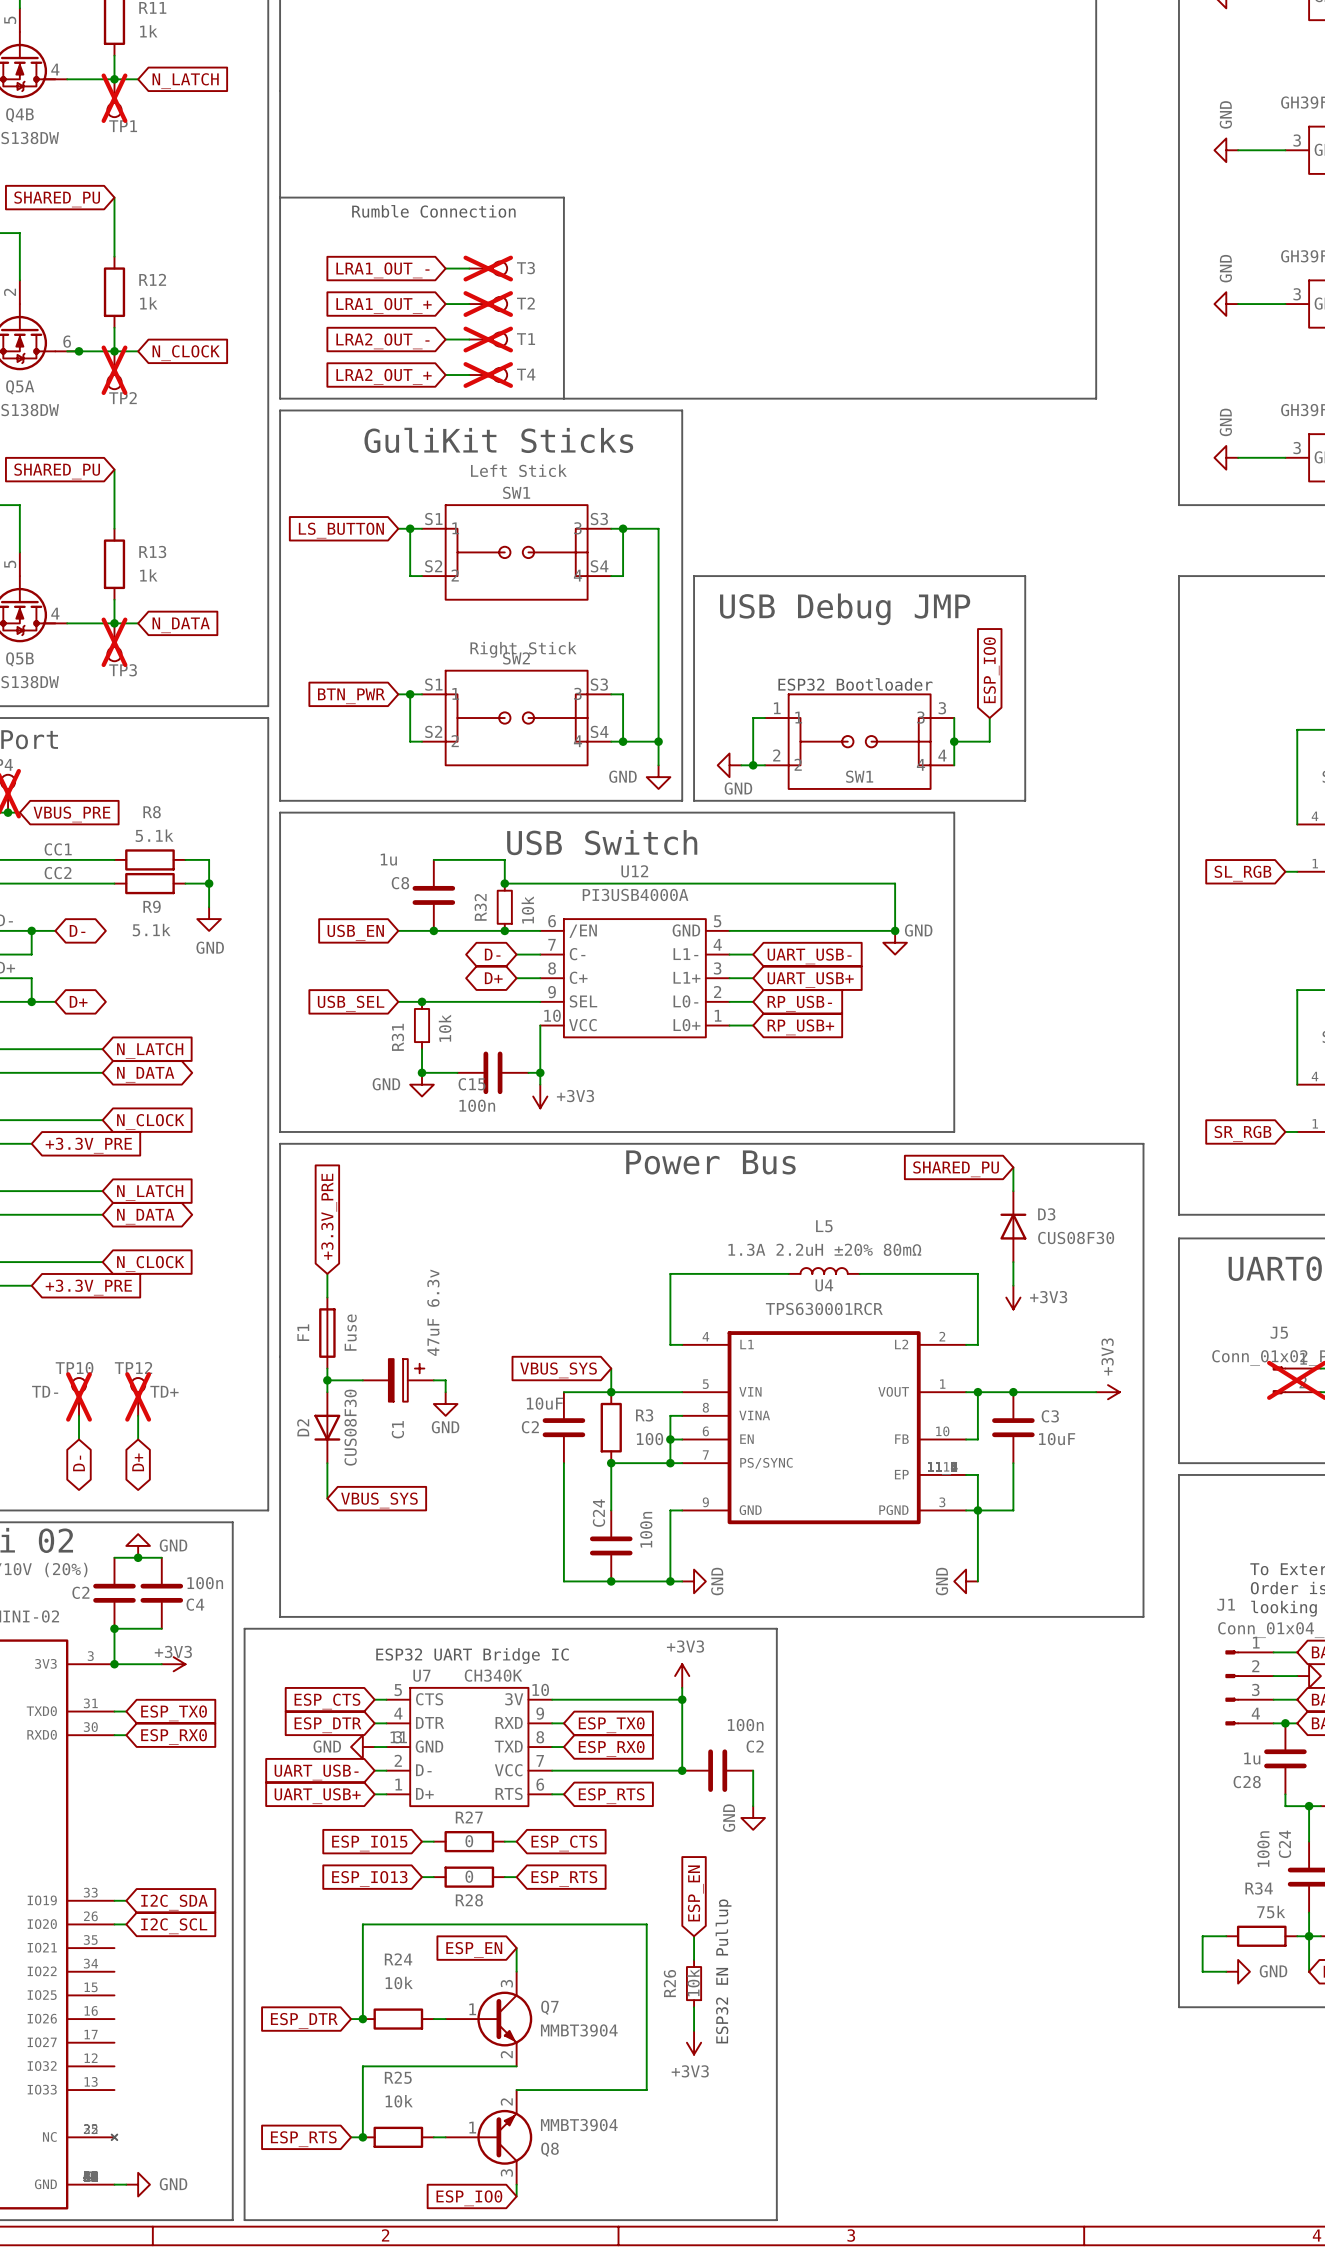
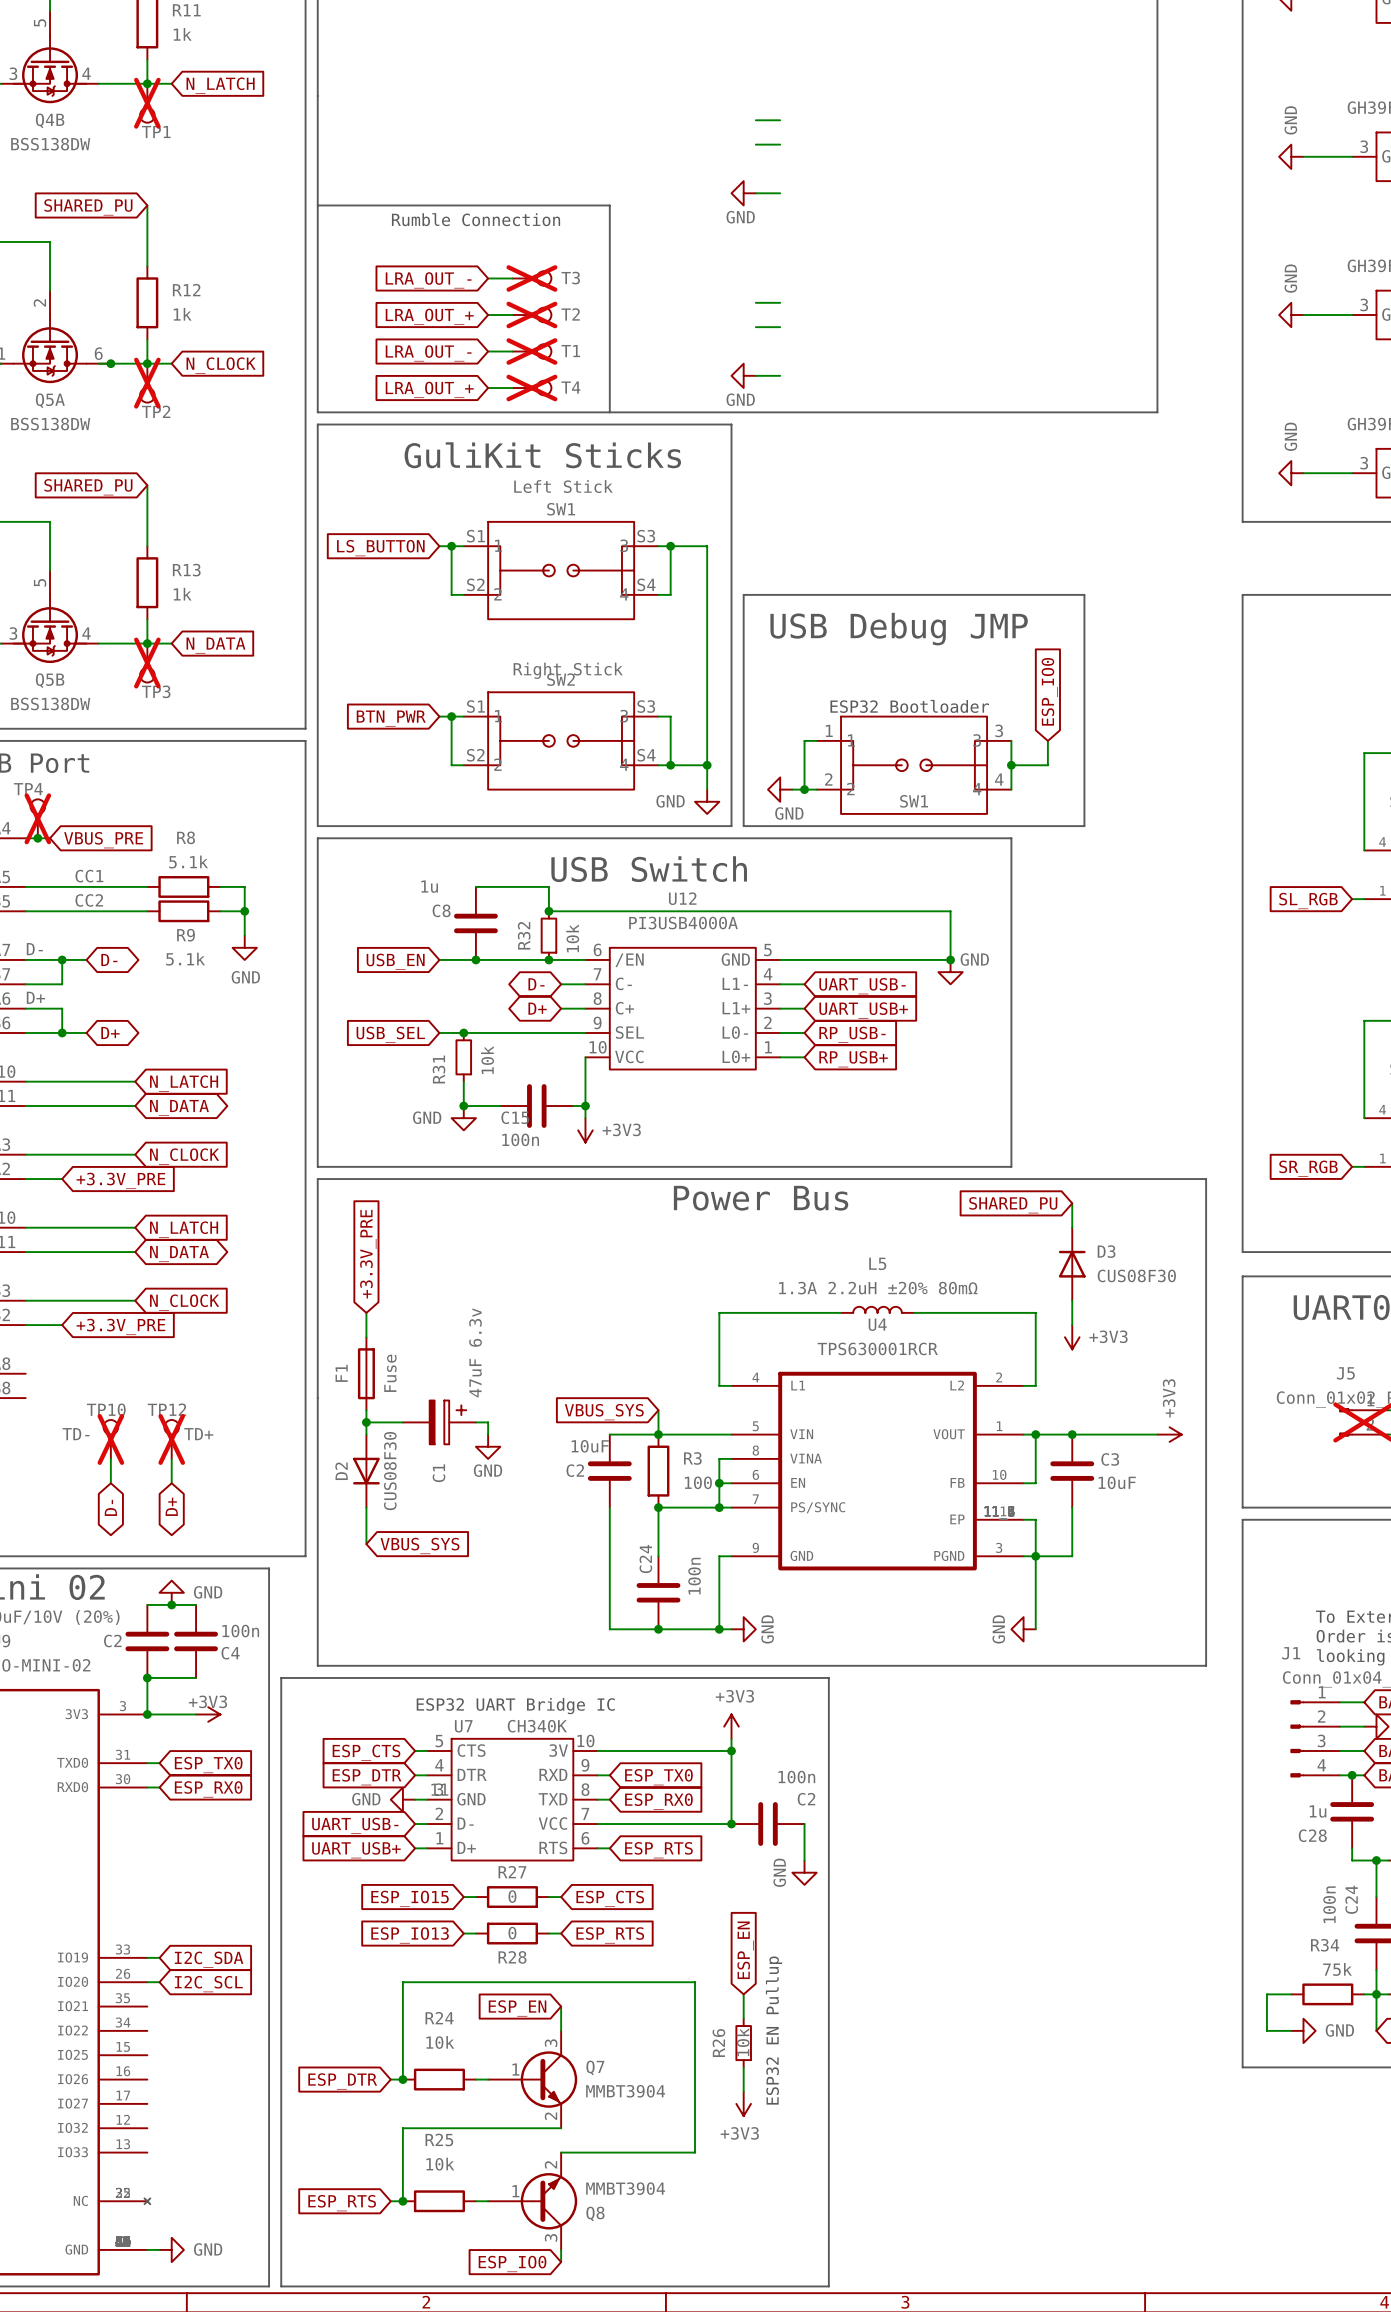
wire: none -> (755, 120) (780, 120)
wire: none -> (755, 144) (780, 144)
power symbol: none -> GND (743, 193)
wire: none -> (755, 193) (780, 193)
global label: LRA1_OUT_- (382, 270) -> LRA_OUT_- (428, 280)
wire: none -> (755, 302) (780, 302)
global label: LRA1_OUT_+ (384, 305) -> LRA_OUT_+ (429, 316)
wire: none -> (755, 327) (780, 327)
global label: LRA2_OUT_- (382, 341) -> LRA_OUT_- (428, 353)
power symbol: none -> GND (743, 375)
wire: none -> (755, 375) (780, 375)
global label: LRA2_OUT_+ (384, 376) -> LRA_OUT_+ (429, 389)

